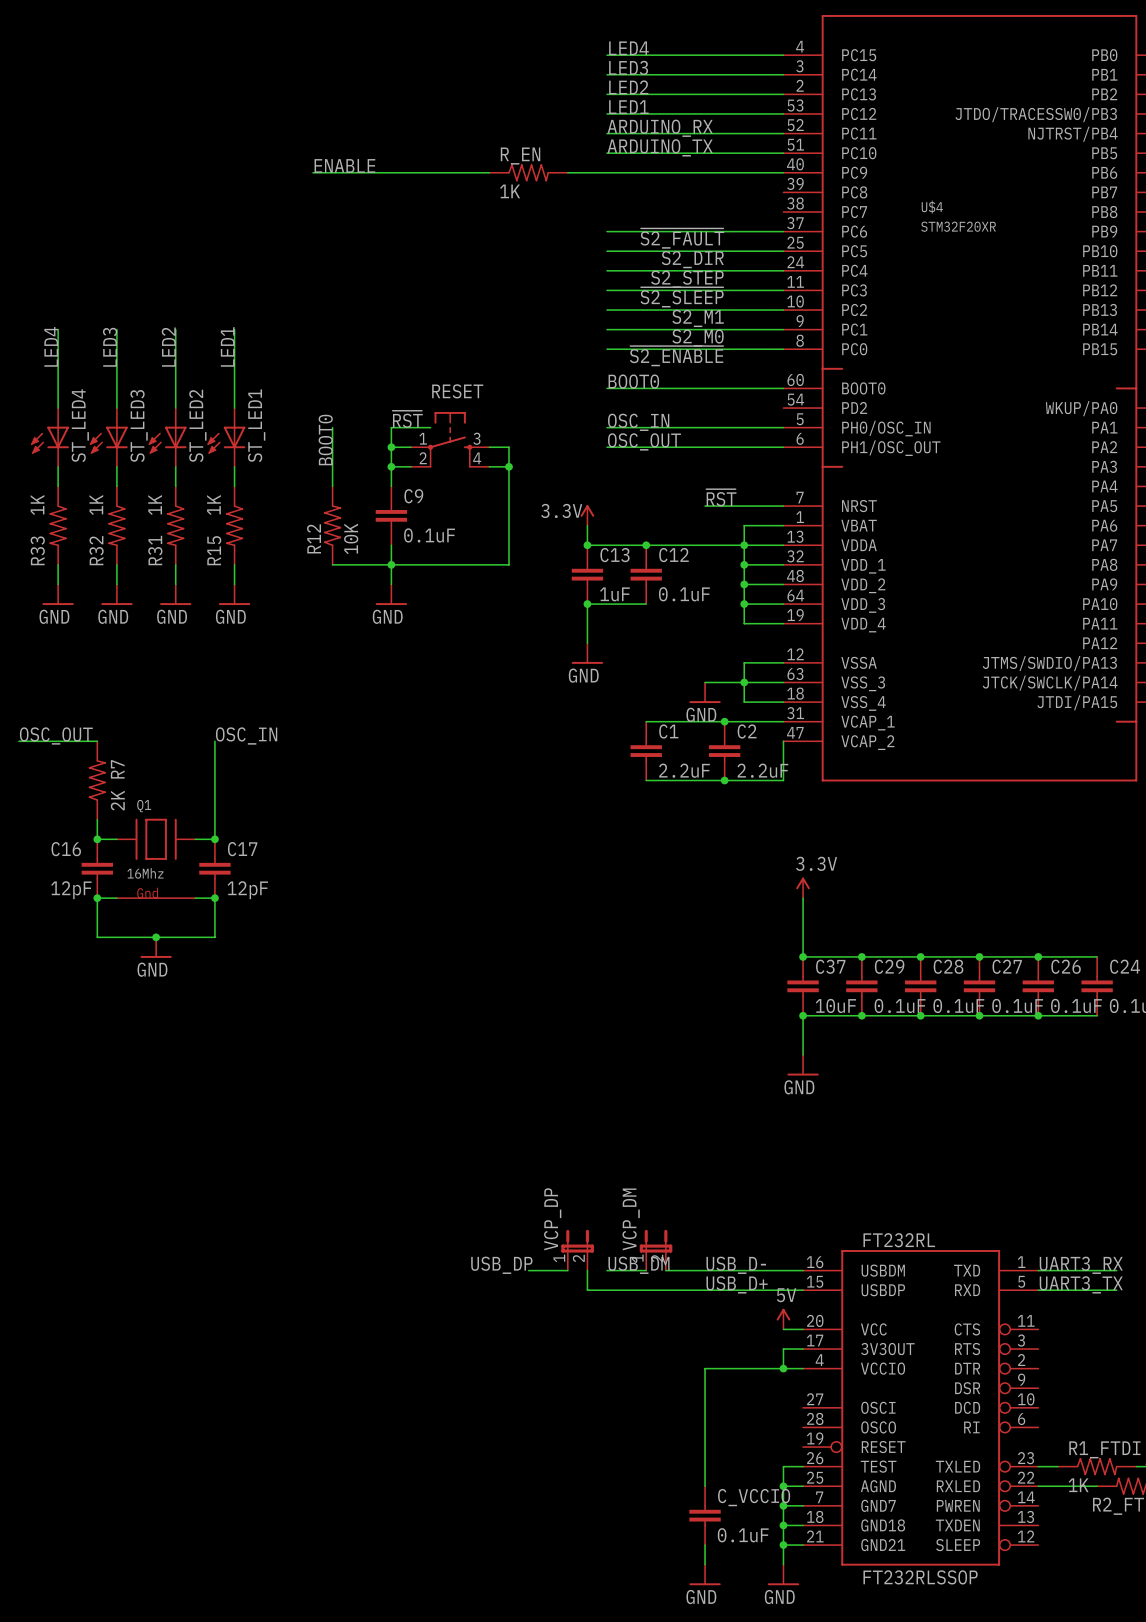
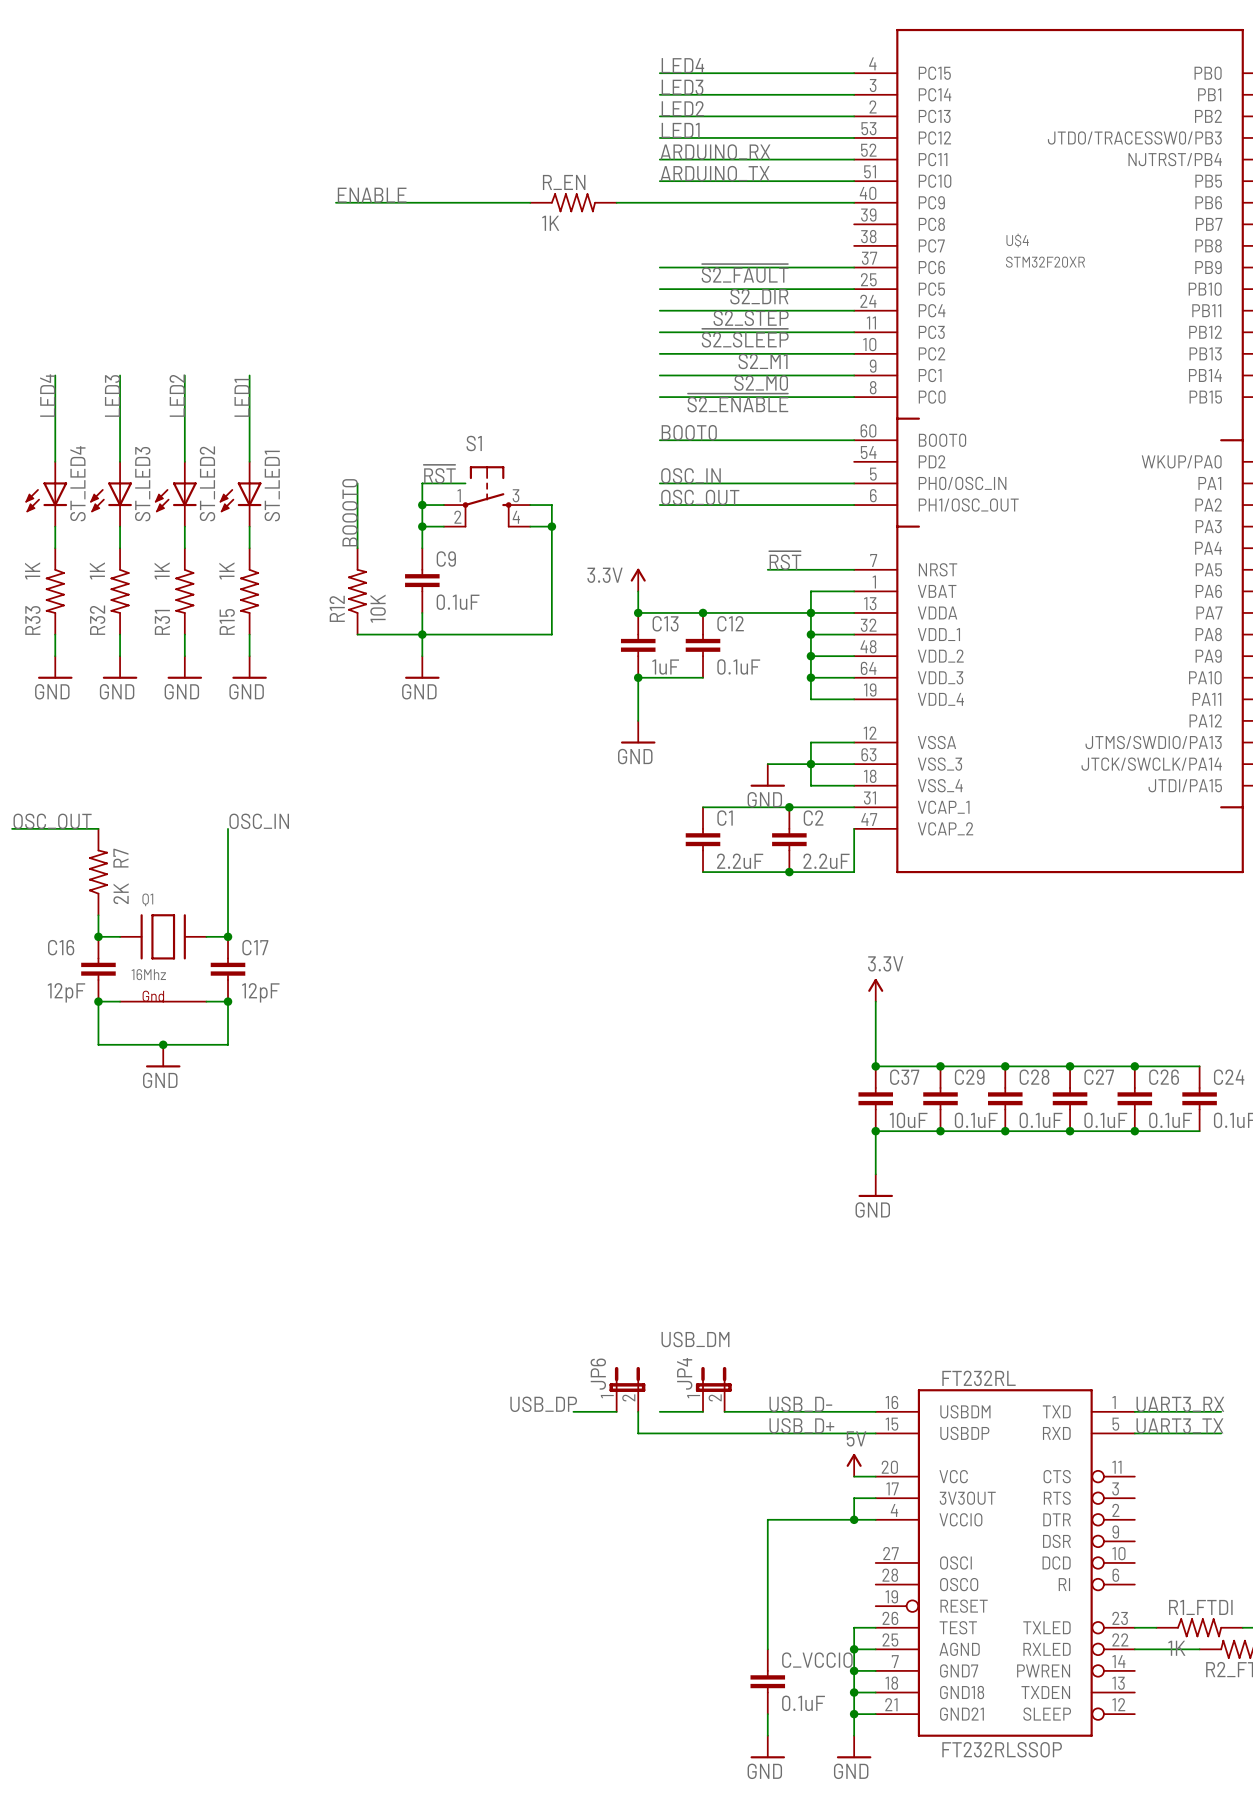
RESET name: RESET (457, 391) -> S1 (474, 443)
label: BOOT0 (325, 440) -> BOOOT0 (350, 512)
VCP_DP name: VCP_DP (552, 1219) -> JP6 (598, 1374)
VCP_DM name: VCP_DM (631, 1219) -> JP4 (684, 1373)
label position: USB_DM (638, 1265) -> USB_DM (695, 1339)

